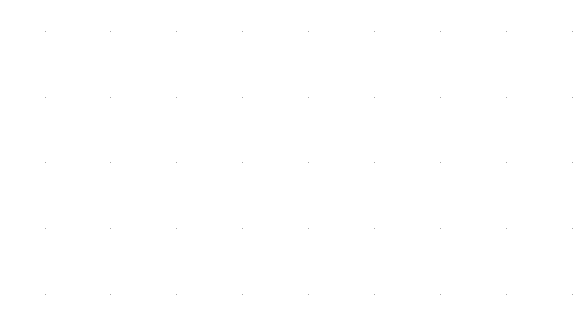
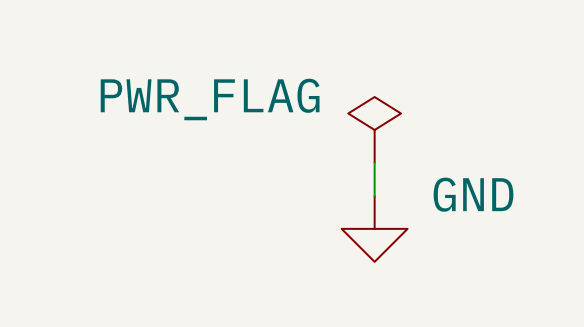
power symbol: none -> PWR_FLAG (374, 129)
wire: none -> (374, 162) (374, 195)
power symbol: none -> GND (374, 228)

